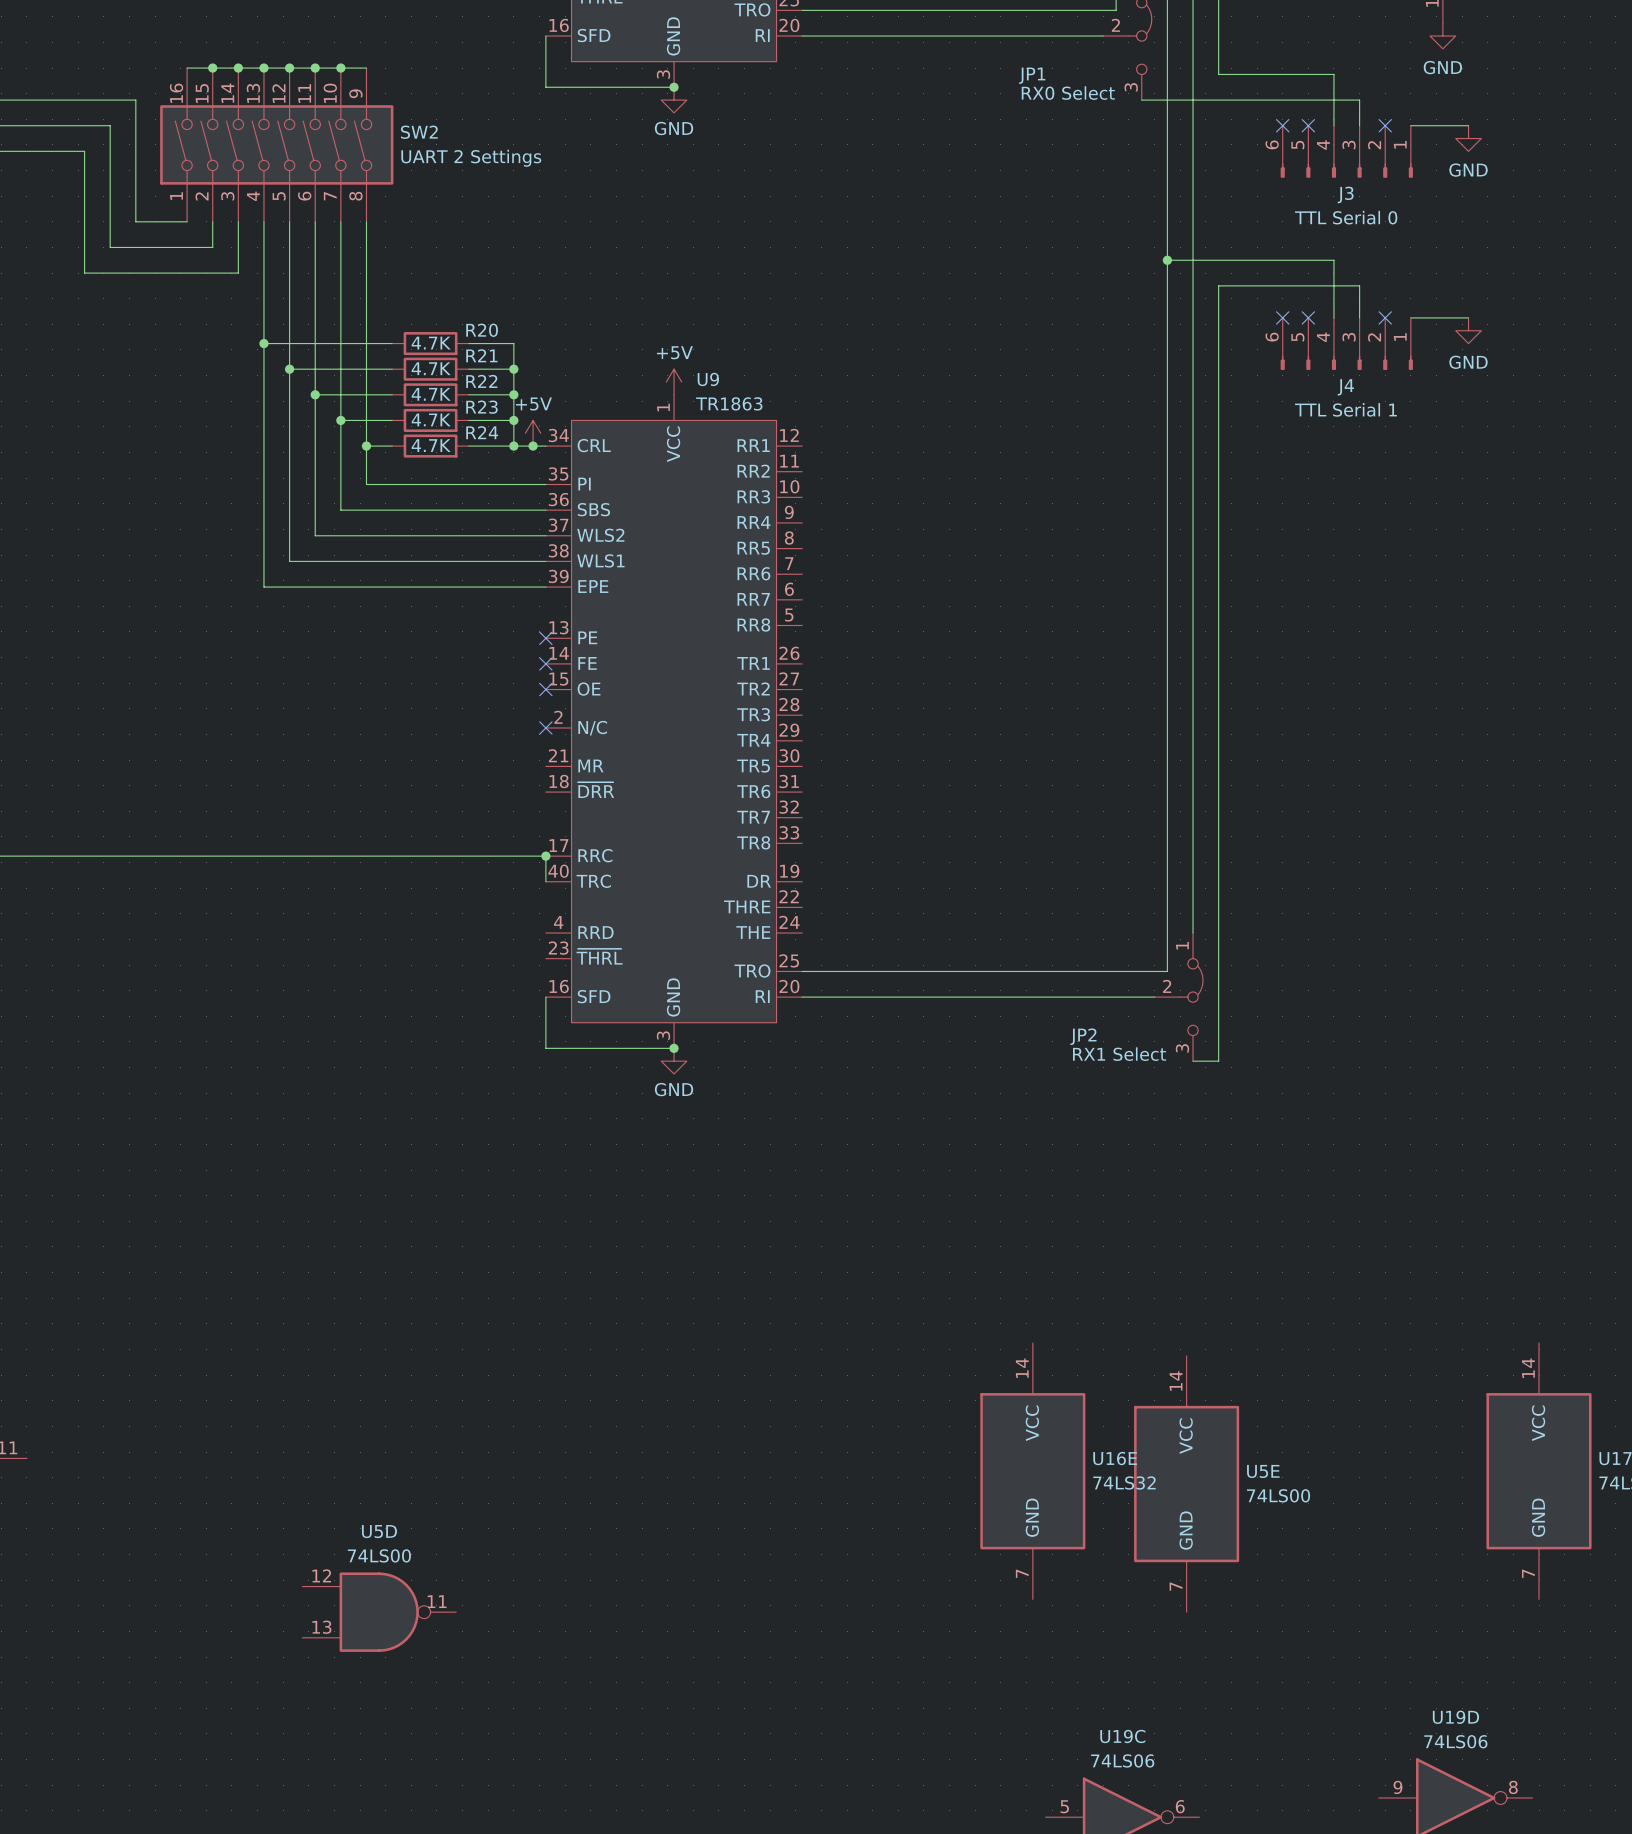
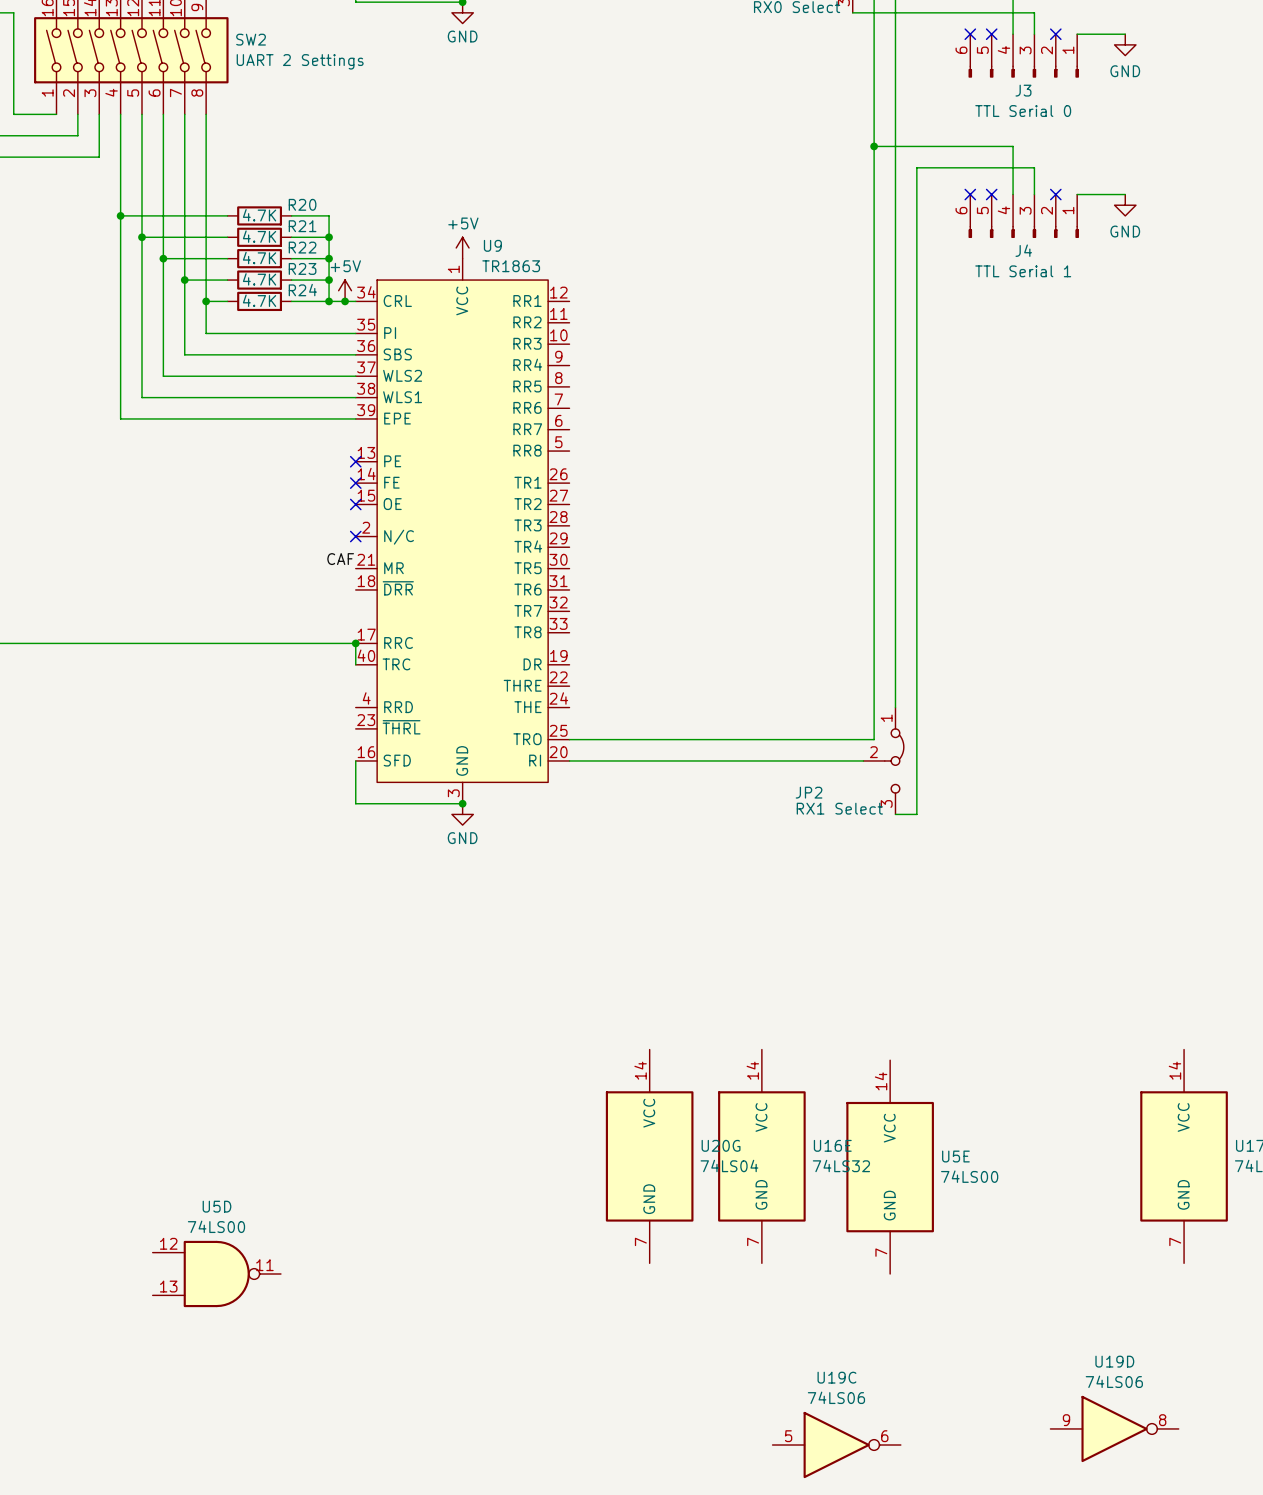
label: none -> CAF (340, 559)
U20G: none -> 74LS04 (649, 1156)

